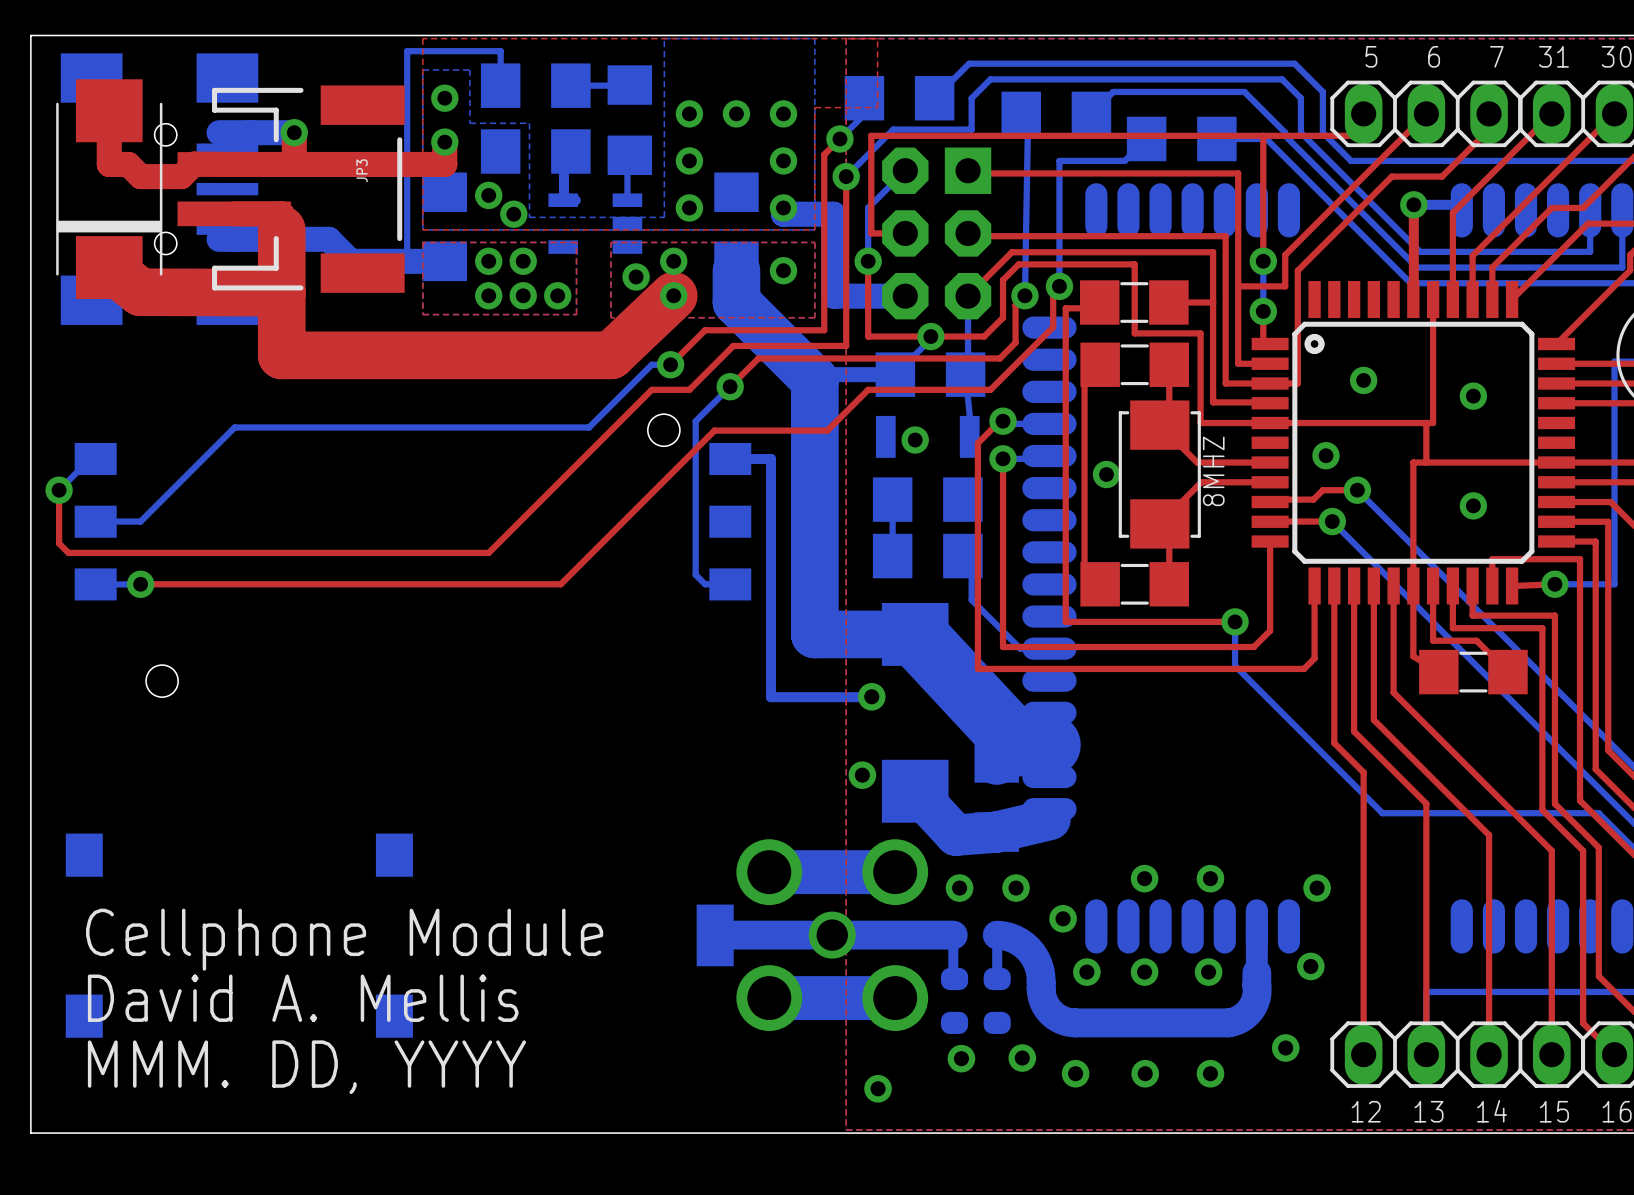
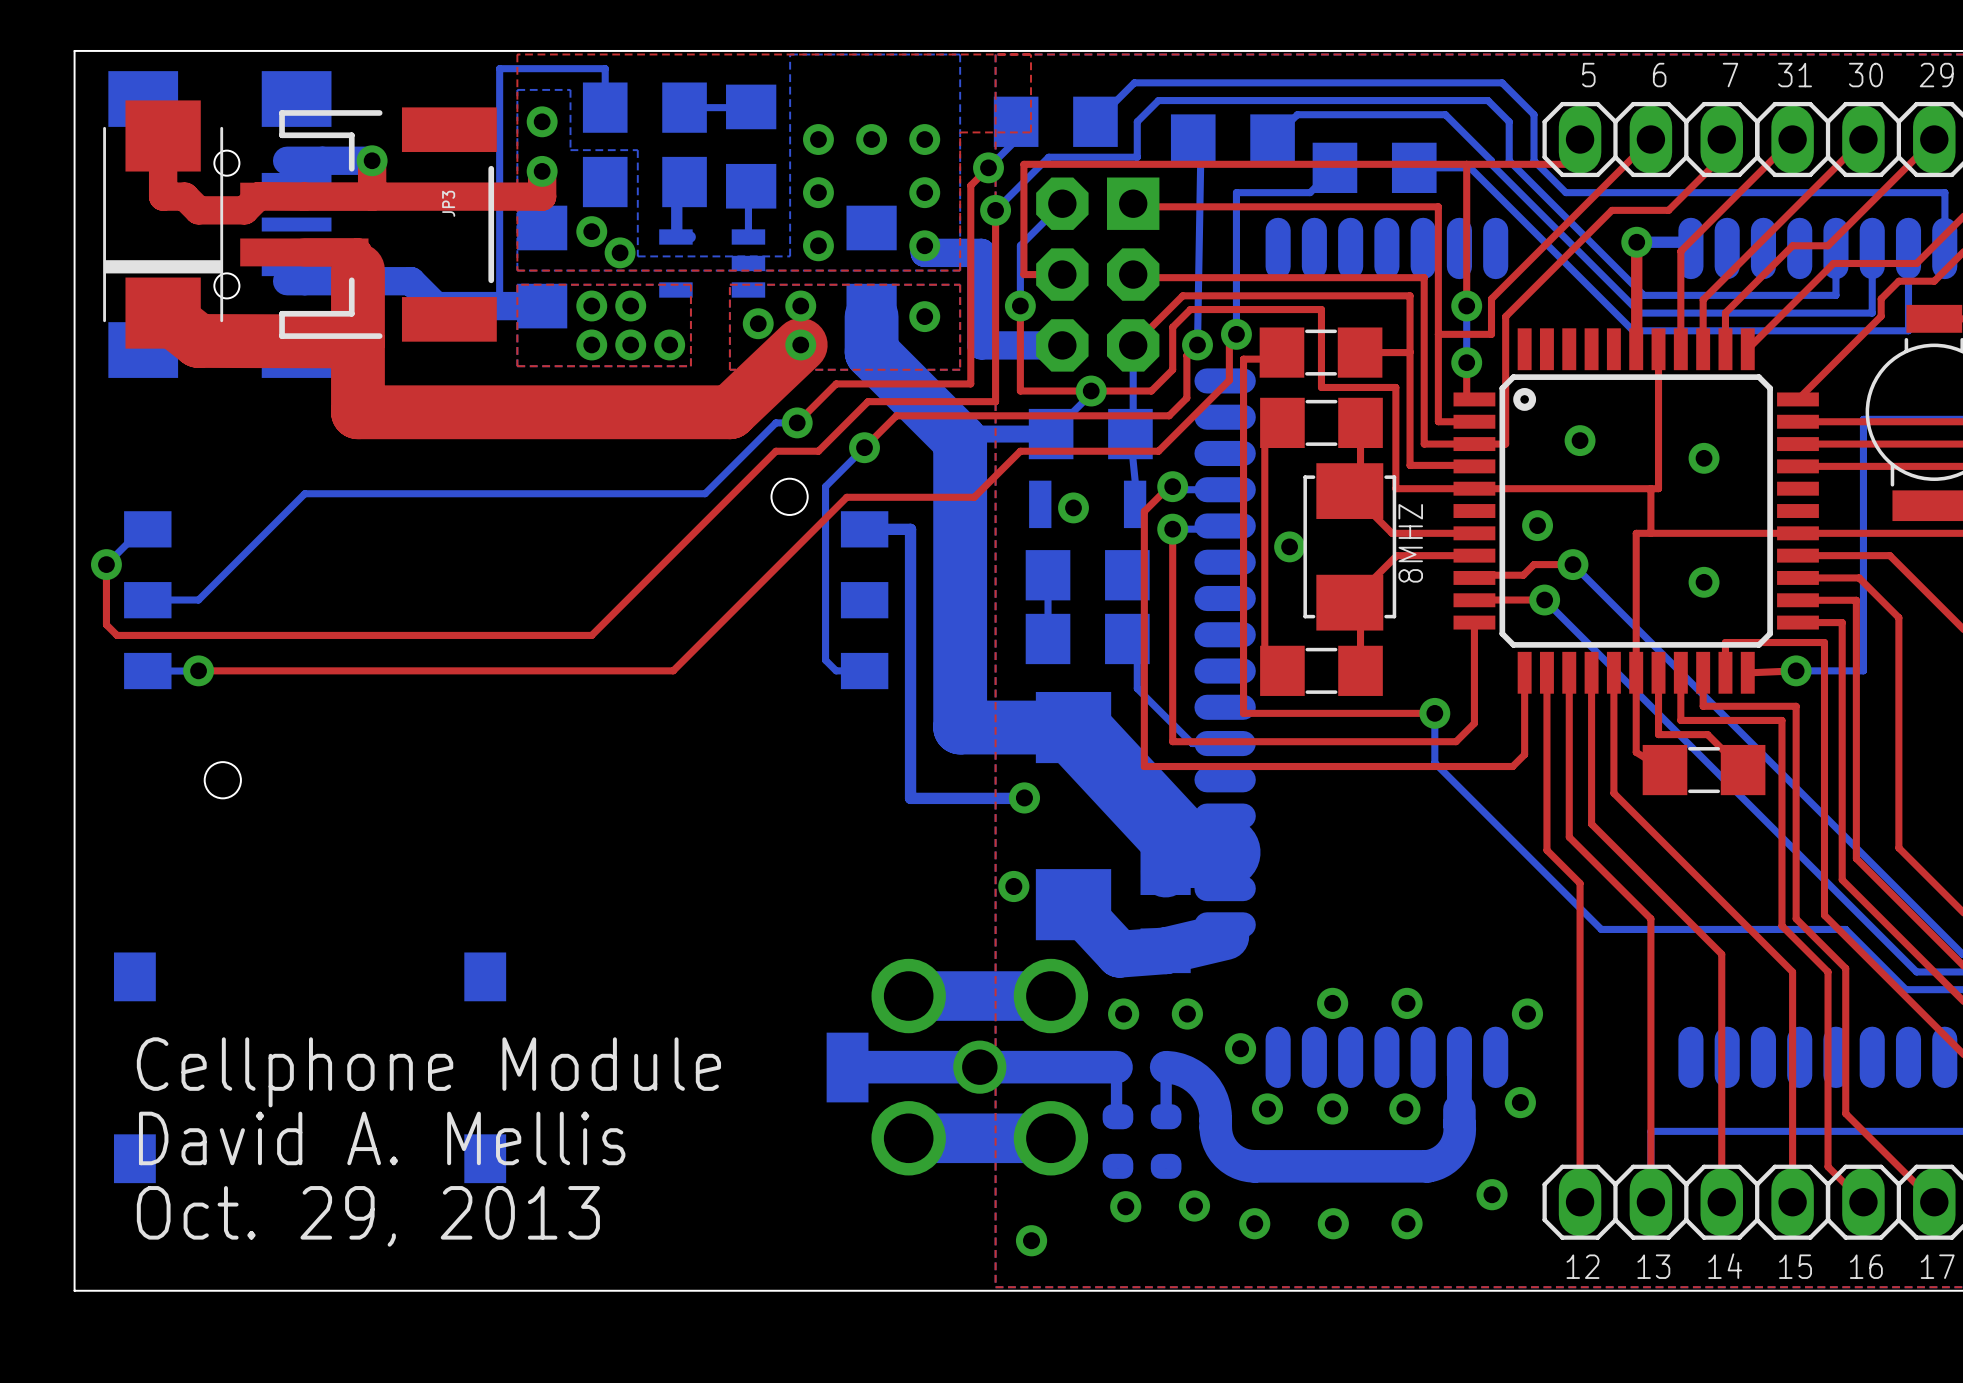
text: MMM. DD, YYYY (306, 1067) -> Oct. 29, 2013 (368, 1216)

